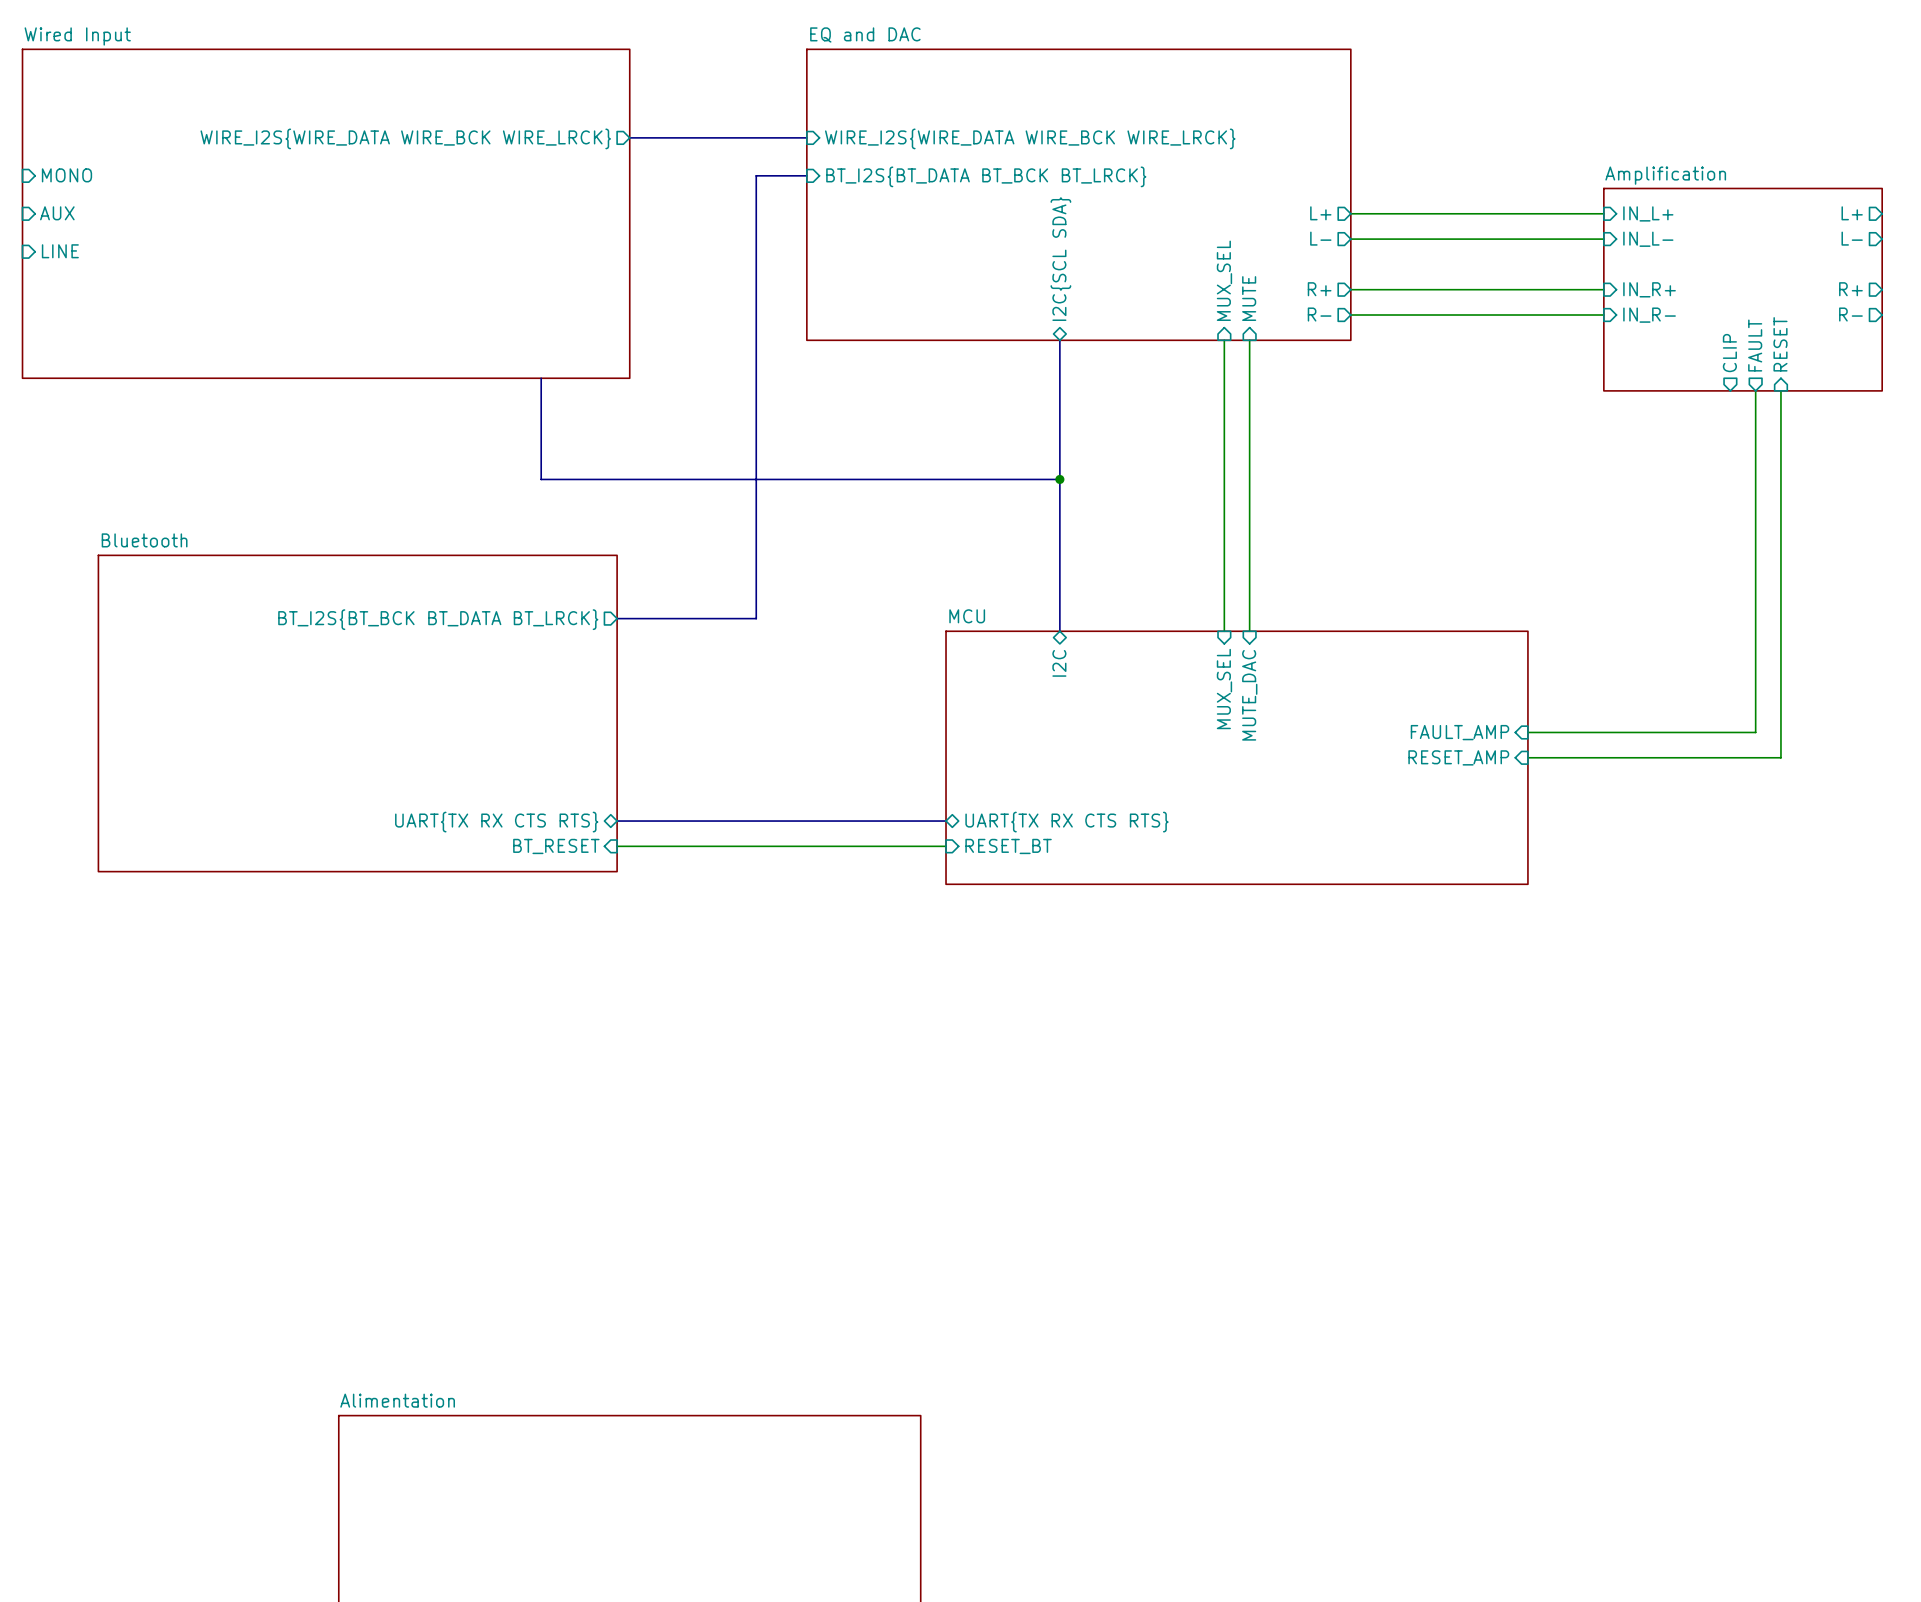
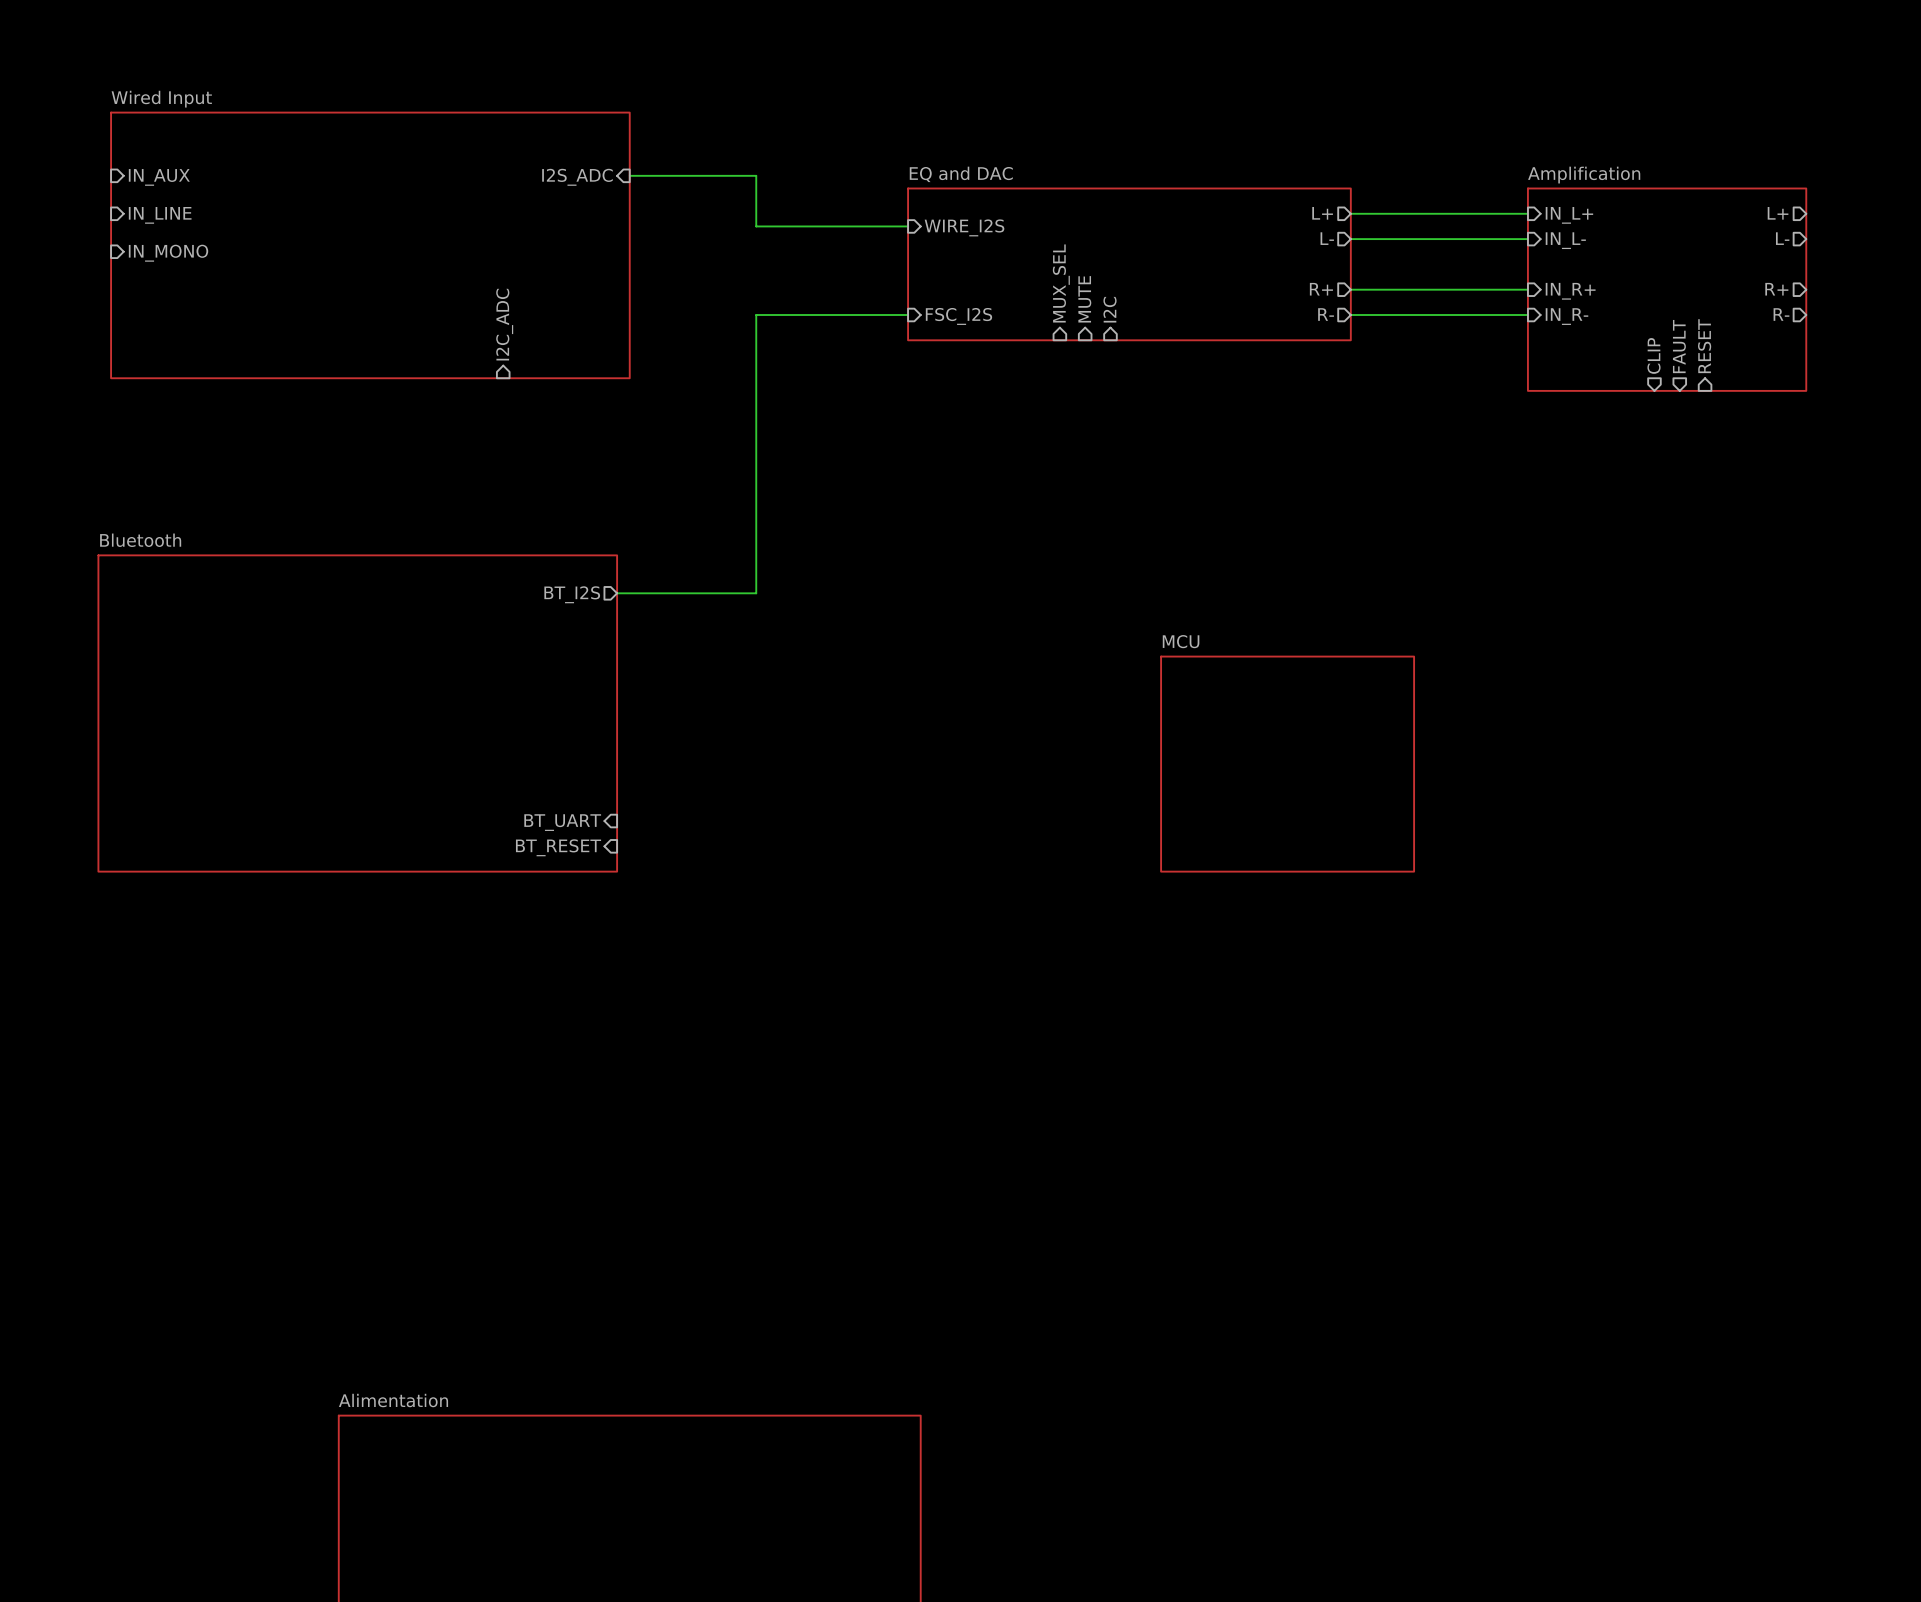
bus: (629, 137) (806, 137) -> none
sheet pin: WIRE_I2S{WIRE_DATA WIRE_BCK WIRE_LRCK} (405, 138) -> none
sheet pin: WIRE_I2S{WIRE_DATA WIRE_BCK WIRE_LRCK} (1030, 138) -> none
sheet pin: MONO (66, 175) -> none
sheet pin: none -> IN_AUX (159, 177)
sheet pin: none -> I2S_ADC (577, 177)
wire: none -> (629, 175) (756, 175) (756, 226) (908, 226)
bus: (806, 175) (756, 175) (756, 618) (617, 618) -> none
sheet pin: BT_I2S{BT_DATA BT_BCK BT_LRCK} (986, 176) -> none
sheet EQ and DAC: (1078, 194) -> none
sheet pin: AUX (57, 213) -> none
sheet pin: none -> IN_LINE (160, 215)
sheet Wired Input: (326, 213) -> none
wire: (1527, 213) (1603, 213) -> none
sheet pin position: IN_L+ (1648, 213) -> IN_L+ (1569, 215)
sheet pin position: L+ (1852, 213) -> L+ (1778, 213)
sheet pin: none -> WIRE_I2S (964, 227)
sheet pin position: L- (1852, 238) -> L- (1782, 238)
wire: (1527, 239) (1603, 239) -> none
sheet pin position: IN_L- (1648, 239) -> IN_L- (1565, 240)
sheet Wired Input: none -> (370, 245)
sheet pin: LINE (60, 251) -> none
sheet pin: none -> IN_MONO (168, 253)
sheet pin shape: bidirectional (1060, 259) -> input (1061, 283)
sheet pin: I2C{SCL SDA} (1060, 259) -> MUX_SEL (1061, 283)
sheet EQ and DAC: none -> (1129, 264)
sheet pin: MUX_SEL (1224, 280) -> none
wire: (1527, 289) (1603, 289) -> none
sheet pin position: IN_R+ (1649, 289) -> IN_R+ (1570, 291)
sheet Amplification position: (1743, 289) -> (1667, 289)
sheet pin position: R+ (1850, 289) -> R+ (1776, 289)
sheet pin position: MUTE (1249, 298) -> MUTE (1084, 299)
sheet pin: none -> I2C (1110, 309)
sheet pin position: R- (1850, 314) -> R- (1781, 314)
wire: none -> (908, 315) (756, 315) (756, 593) (617, 593)
sheet pin: none -> FSC_I2S (958, 316)
wire: (1527, 315) (1603, 315) -> none
sheet pin position: IN_R- (1649, 315) -> IN_R- (1566, 316)
sheet pin: none -> I2C_ADC (504, 324)
bus: (1059, 340) (1059, 631) -> none
wire: (1224, 340) (1224, 631) -> none
wire: (1249, 340) (1249, 631) -> none
sheet pin position: RESET (1780, 344) -> RESET (1704, 346)
sheet pin position: FAULT (1755, 345) -> FAULT (1679, 346)
sheet pin position: CLIP (1729, 353) -> CLIP (1653, 355)
bus: (541, 378) (541, 479) (1059, 479) -> none
wire: (1755, 390) (1755, 732) (1527, 732) -> none
wire: (1780, 390) (1780, 757) (1527, 757) -> none
junction: (1059, 479) -> none
sheet pin: none -> BT_I2S (572, 594)
sheet pin: BT_I2S{BT_BCK BT_DATA BT_LRCK} (438, 619) -> none
sheet pin: I2C (1059, 663) -> none
sheet pin: MUX_SEL (1224, 688) -> none
sheet pin: MUTE_DAC (1249, 695) -> none
sheet pin: FAULT_AMP (1459, 732) -> none
sheet MCU: (1236, 757) -> none
sheet pin: RESET_AMP (1458, 757) -> none
sheet MCU: none -> (1287, 764)
bus: (617, 821) (946, 821) -> none
sheet pin shape: bidirectional (496, 822) -> input (562, 822)
sheet pin: UART{TX RX CTS RTS} (496, 822) -> BT_UART (562, 822)
sheet pin: UART{TX RX CTS RTS} (1067, 822) -> none
wire: (617, 846) (946, 846) -> none
sheet pin: RESET_BT (1008, 846) -> none

